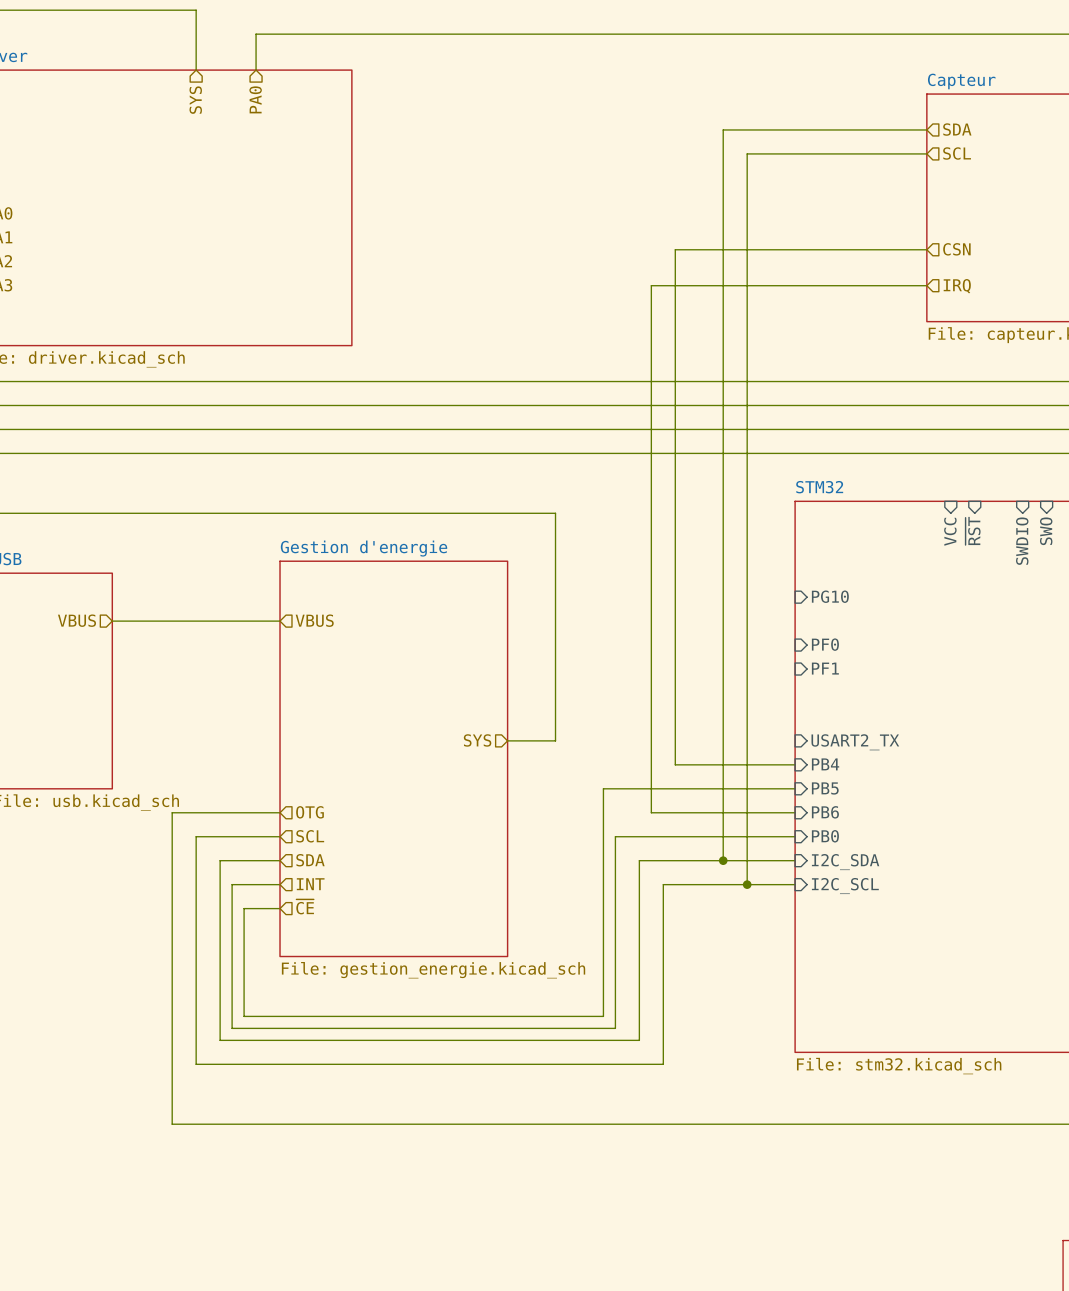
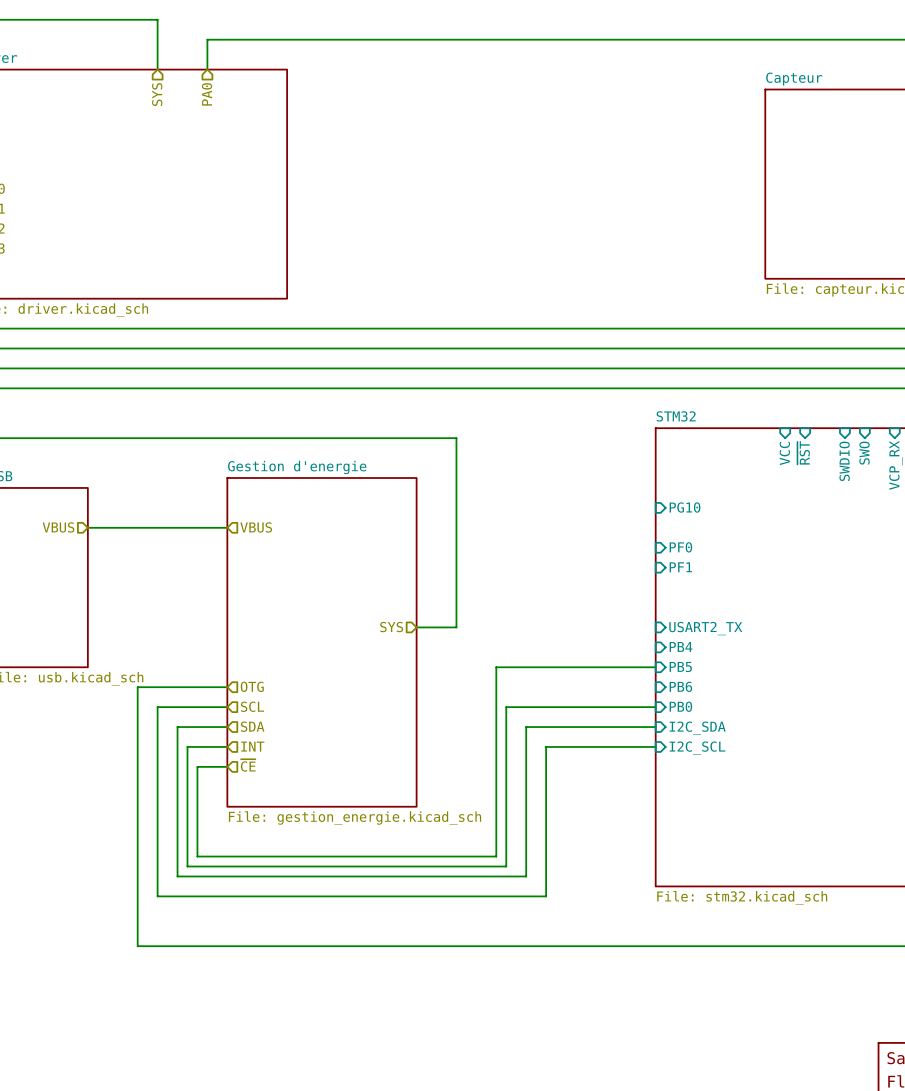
wire: (926, 129) (723, 129) (723, 860) -> none
hierarchical label: SDA (957, 129) -> none
wire: (926, 153) (747, 153) (747, 884) -> none
hierarchical label: SCL (957, 153) -> none
wire: (926, 249) (675, 249) (675, 764) (795, 764) -> none
hierarchical label: CSN (956, 249) -> none
wire: (926, 285) (651, 285) (651, 812) (795, 812) -> none
hierarchical label: IRQ (957, 286) -> none
junction: (723, 860) -> none
junction: (747, 884) -> none

